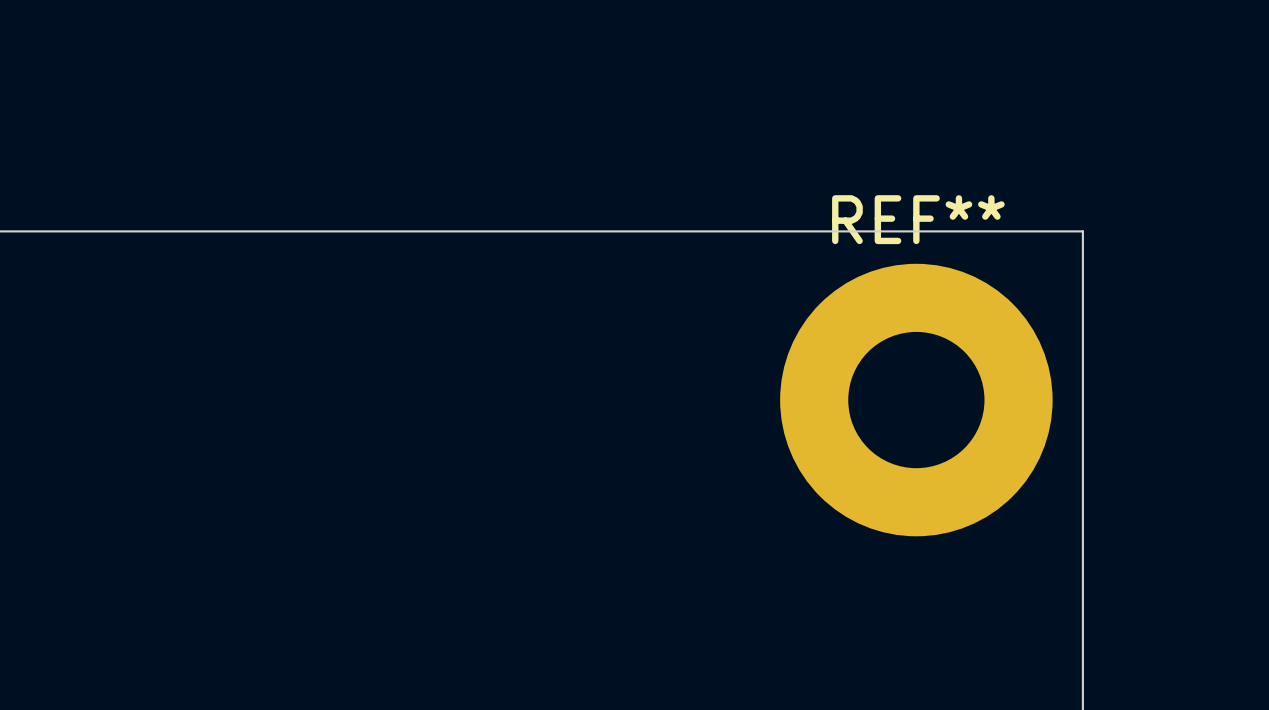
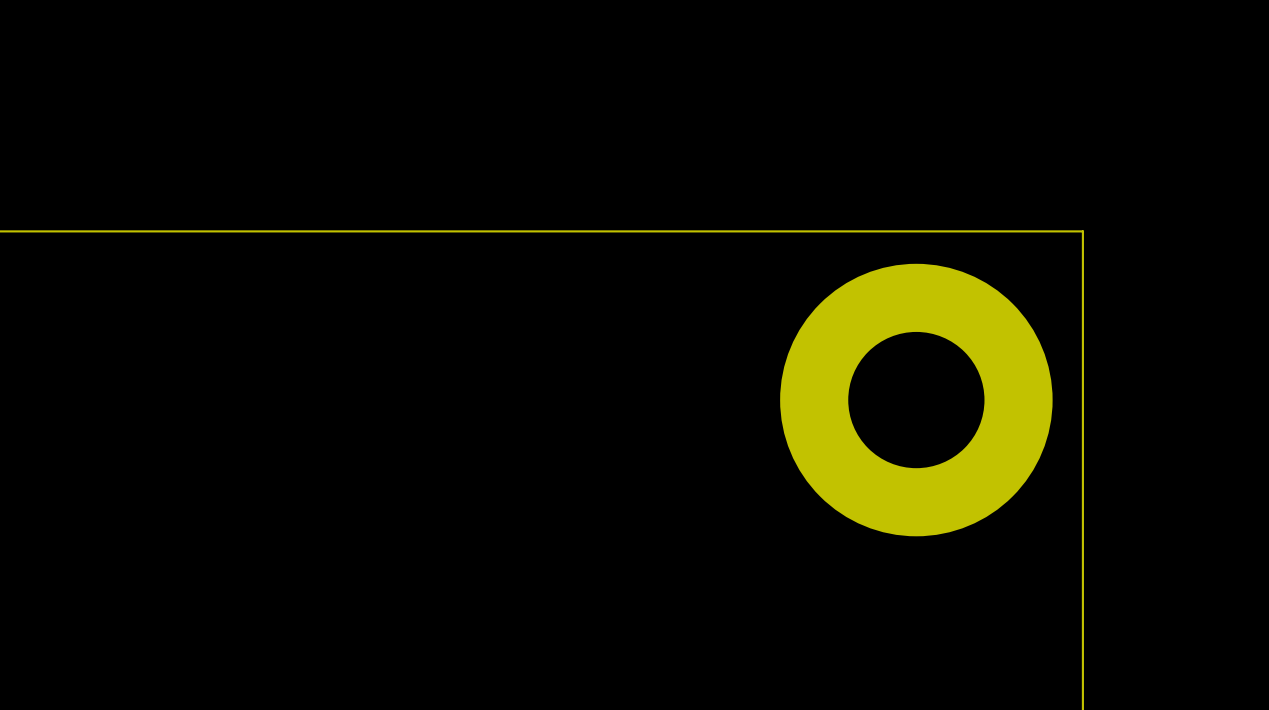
REF** name: REF** (918, 219) -> none

